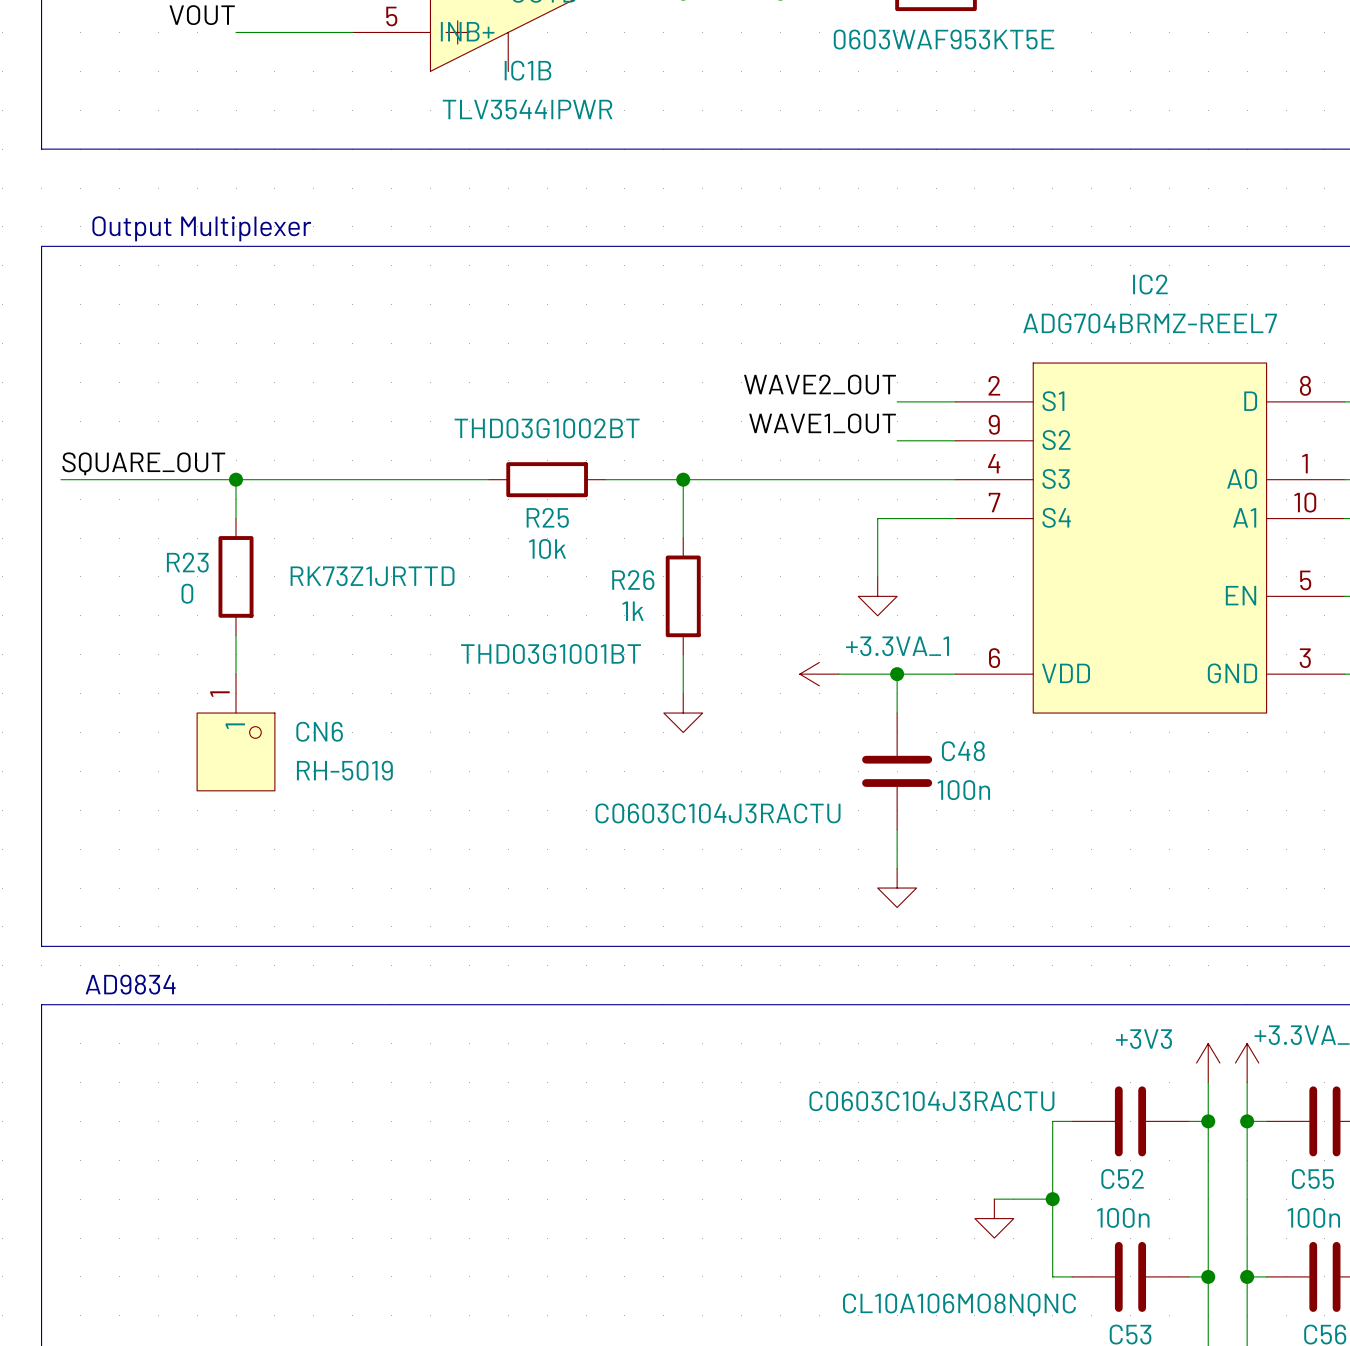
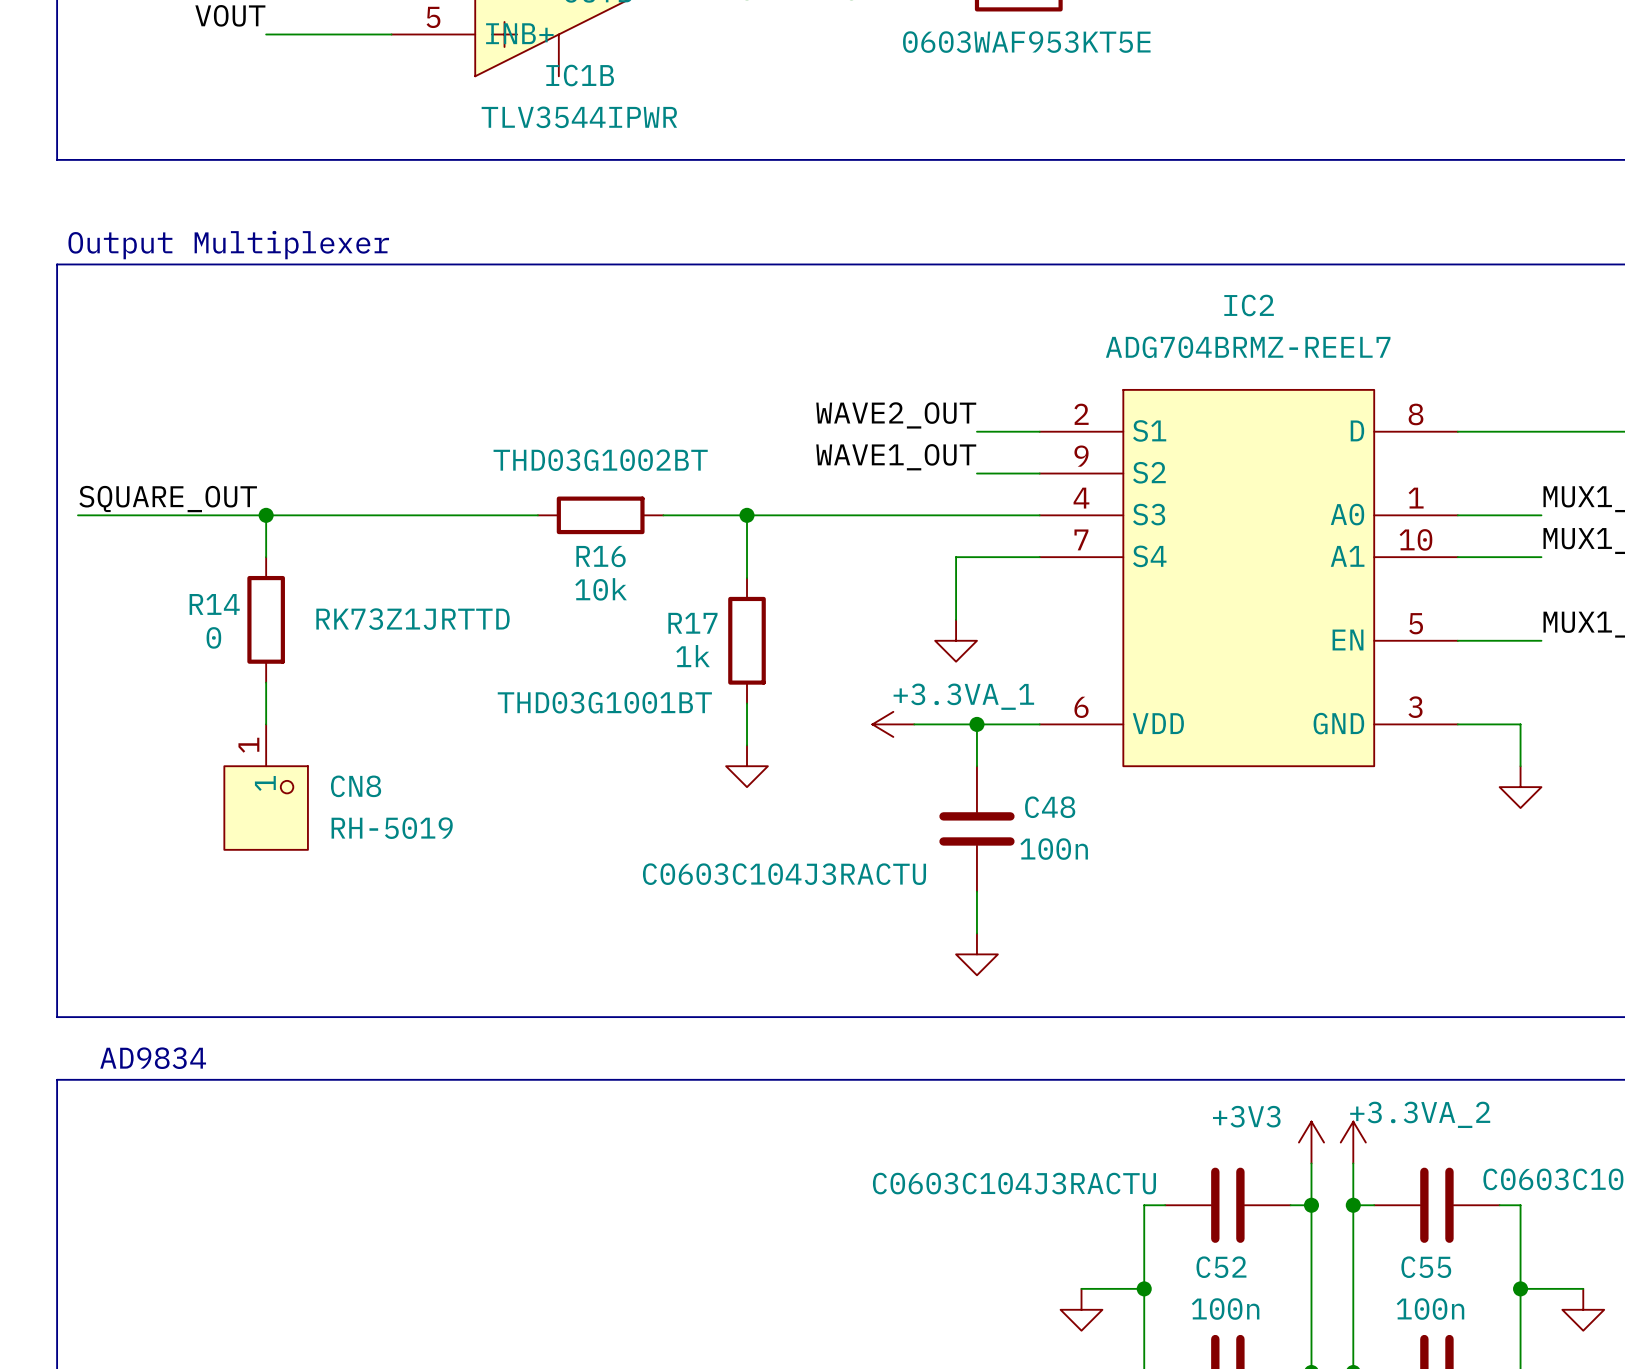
R25 name: R25 (547, 517) -> R16 (601, 556)
R23 name: R23 (187, 562) -> R14 (214, 604)
R26 name: R26 (633, 580) -> R17 (692, 623)
CN6 name: CN6 (319, 731) -> CN8 (356, 786)

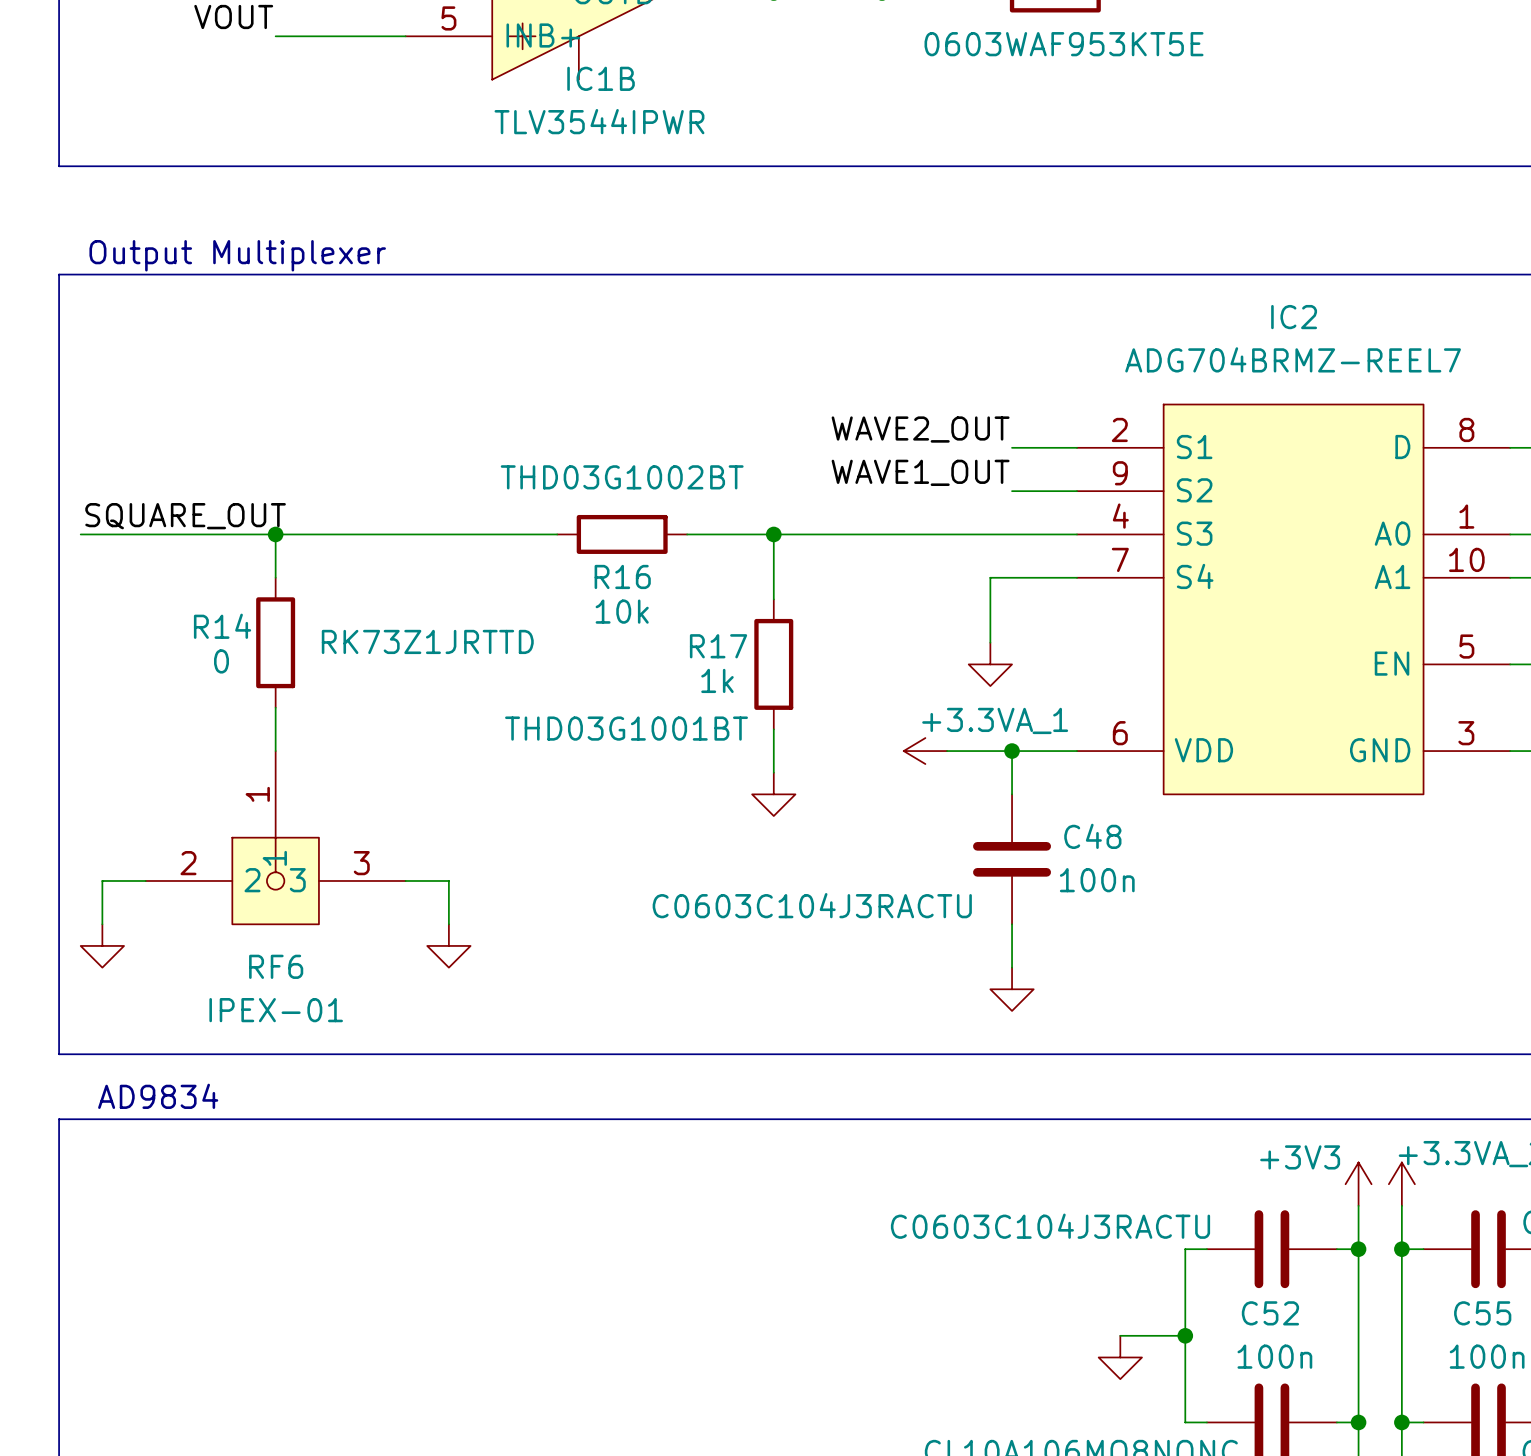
CN8: RH-5019 (266, 787) -> none
RF6: none -> IPEX-01 (275, 837)
wire: none -> (145, 880) (102, 880) (102, 924)
wire: none -> (405, 880) (448, 880) (448, 924)
power symbol: none -> (102, 945)
power symbol: none -> (448, 945)

